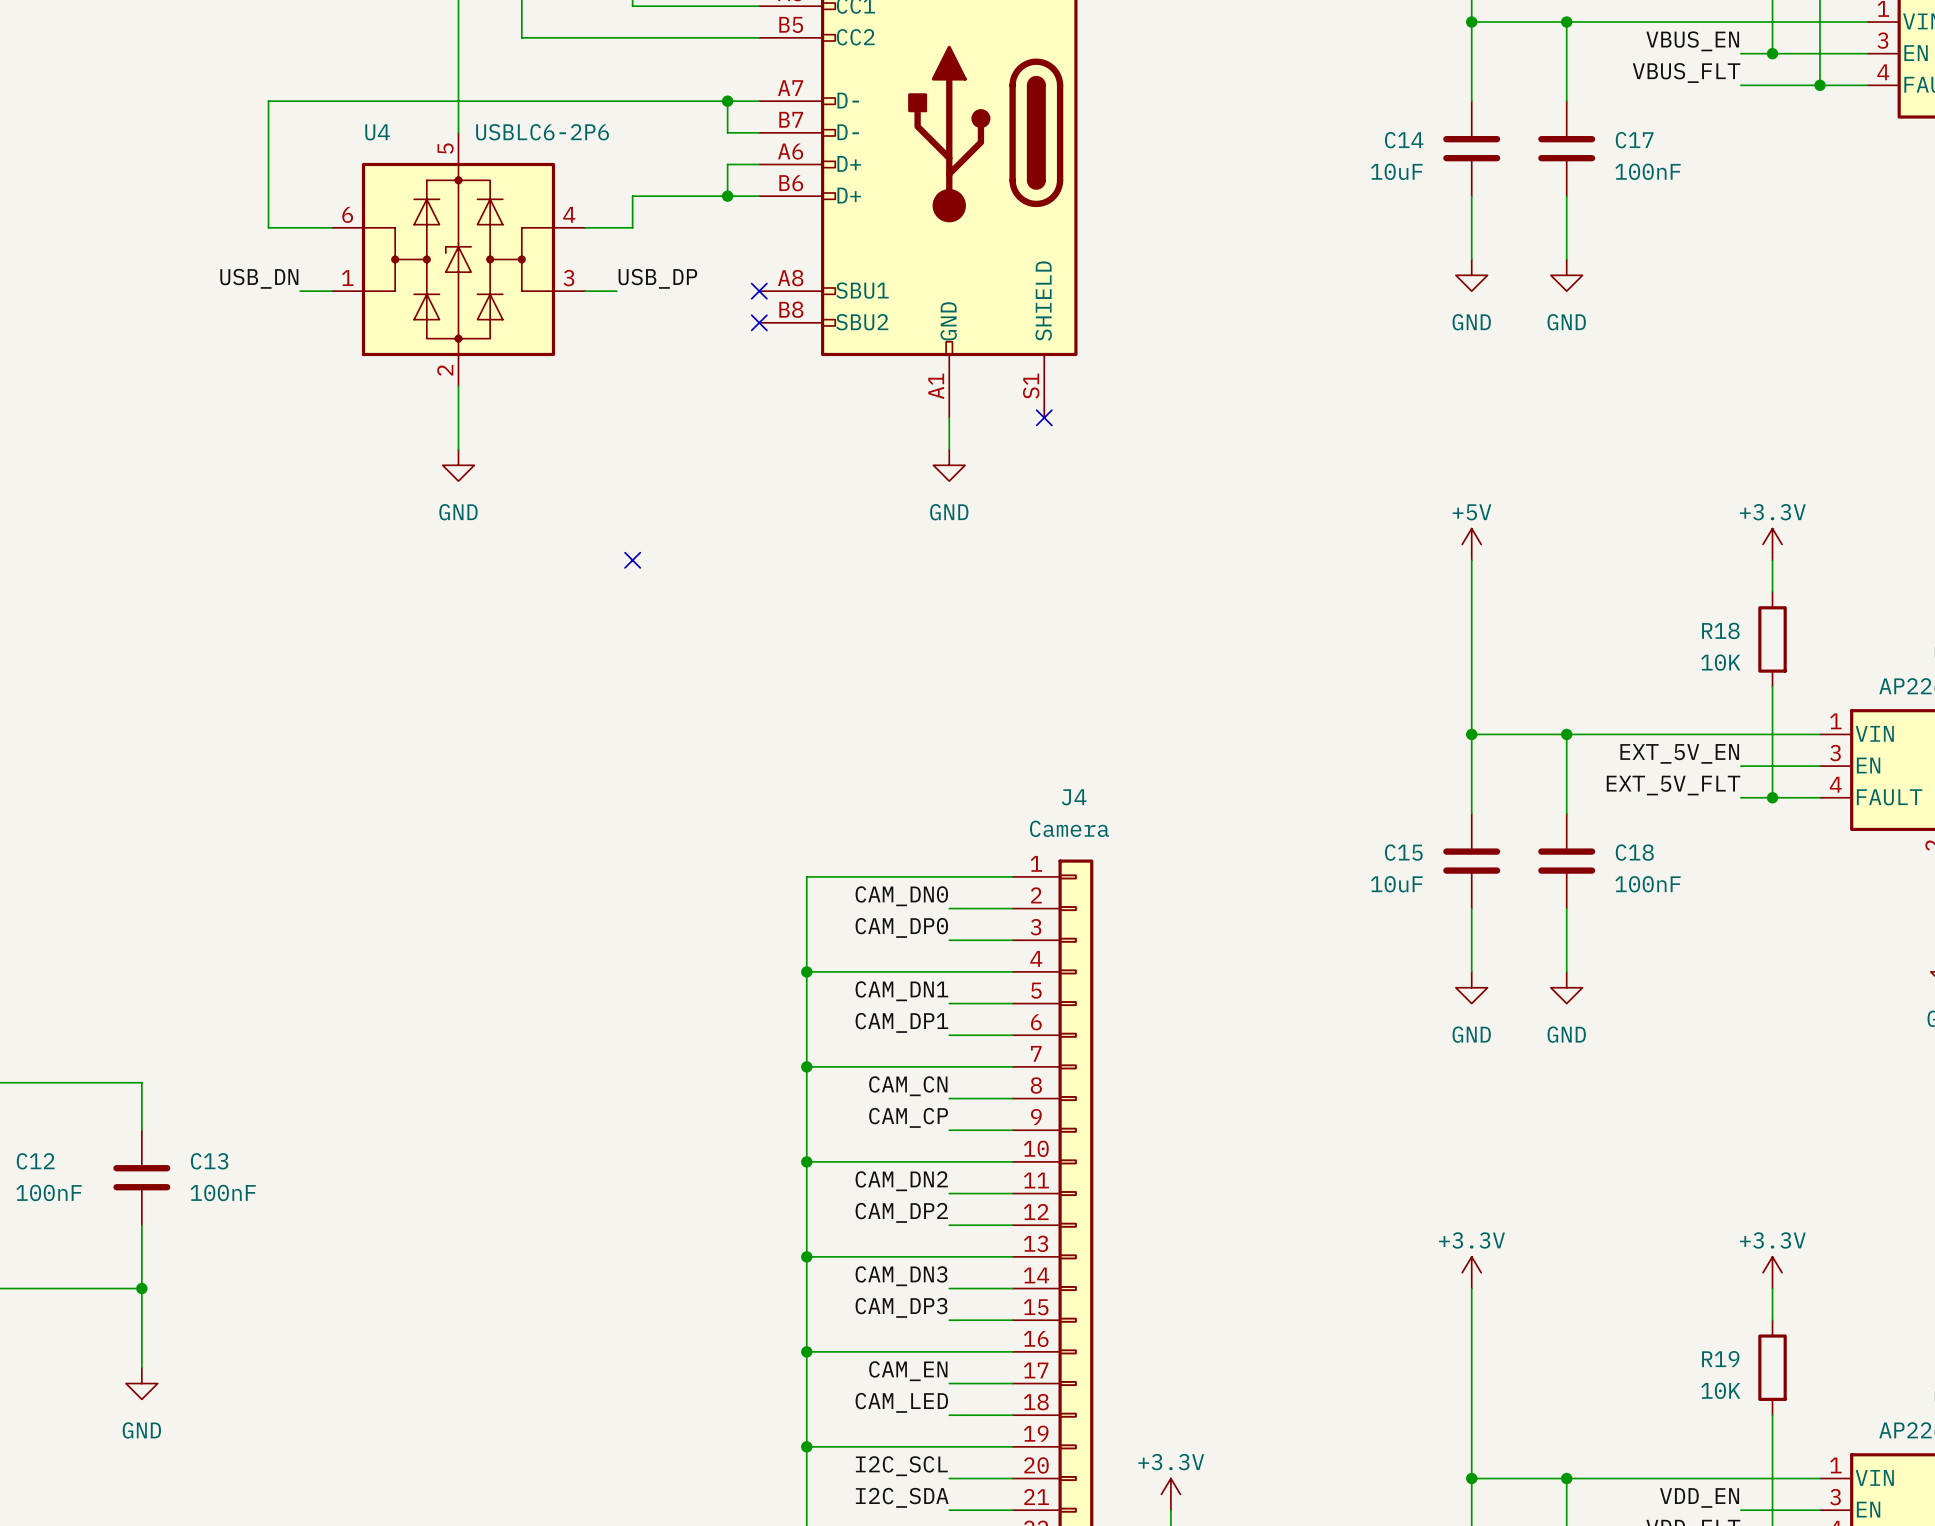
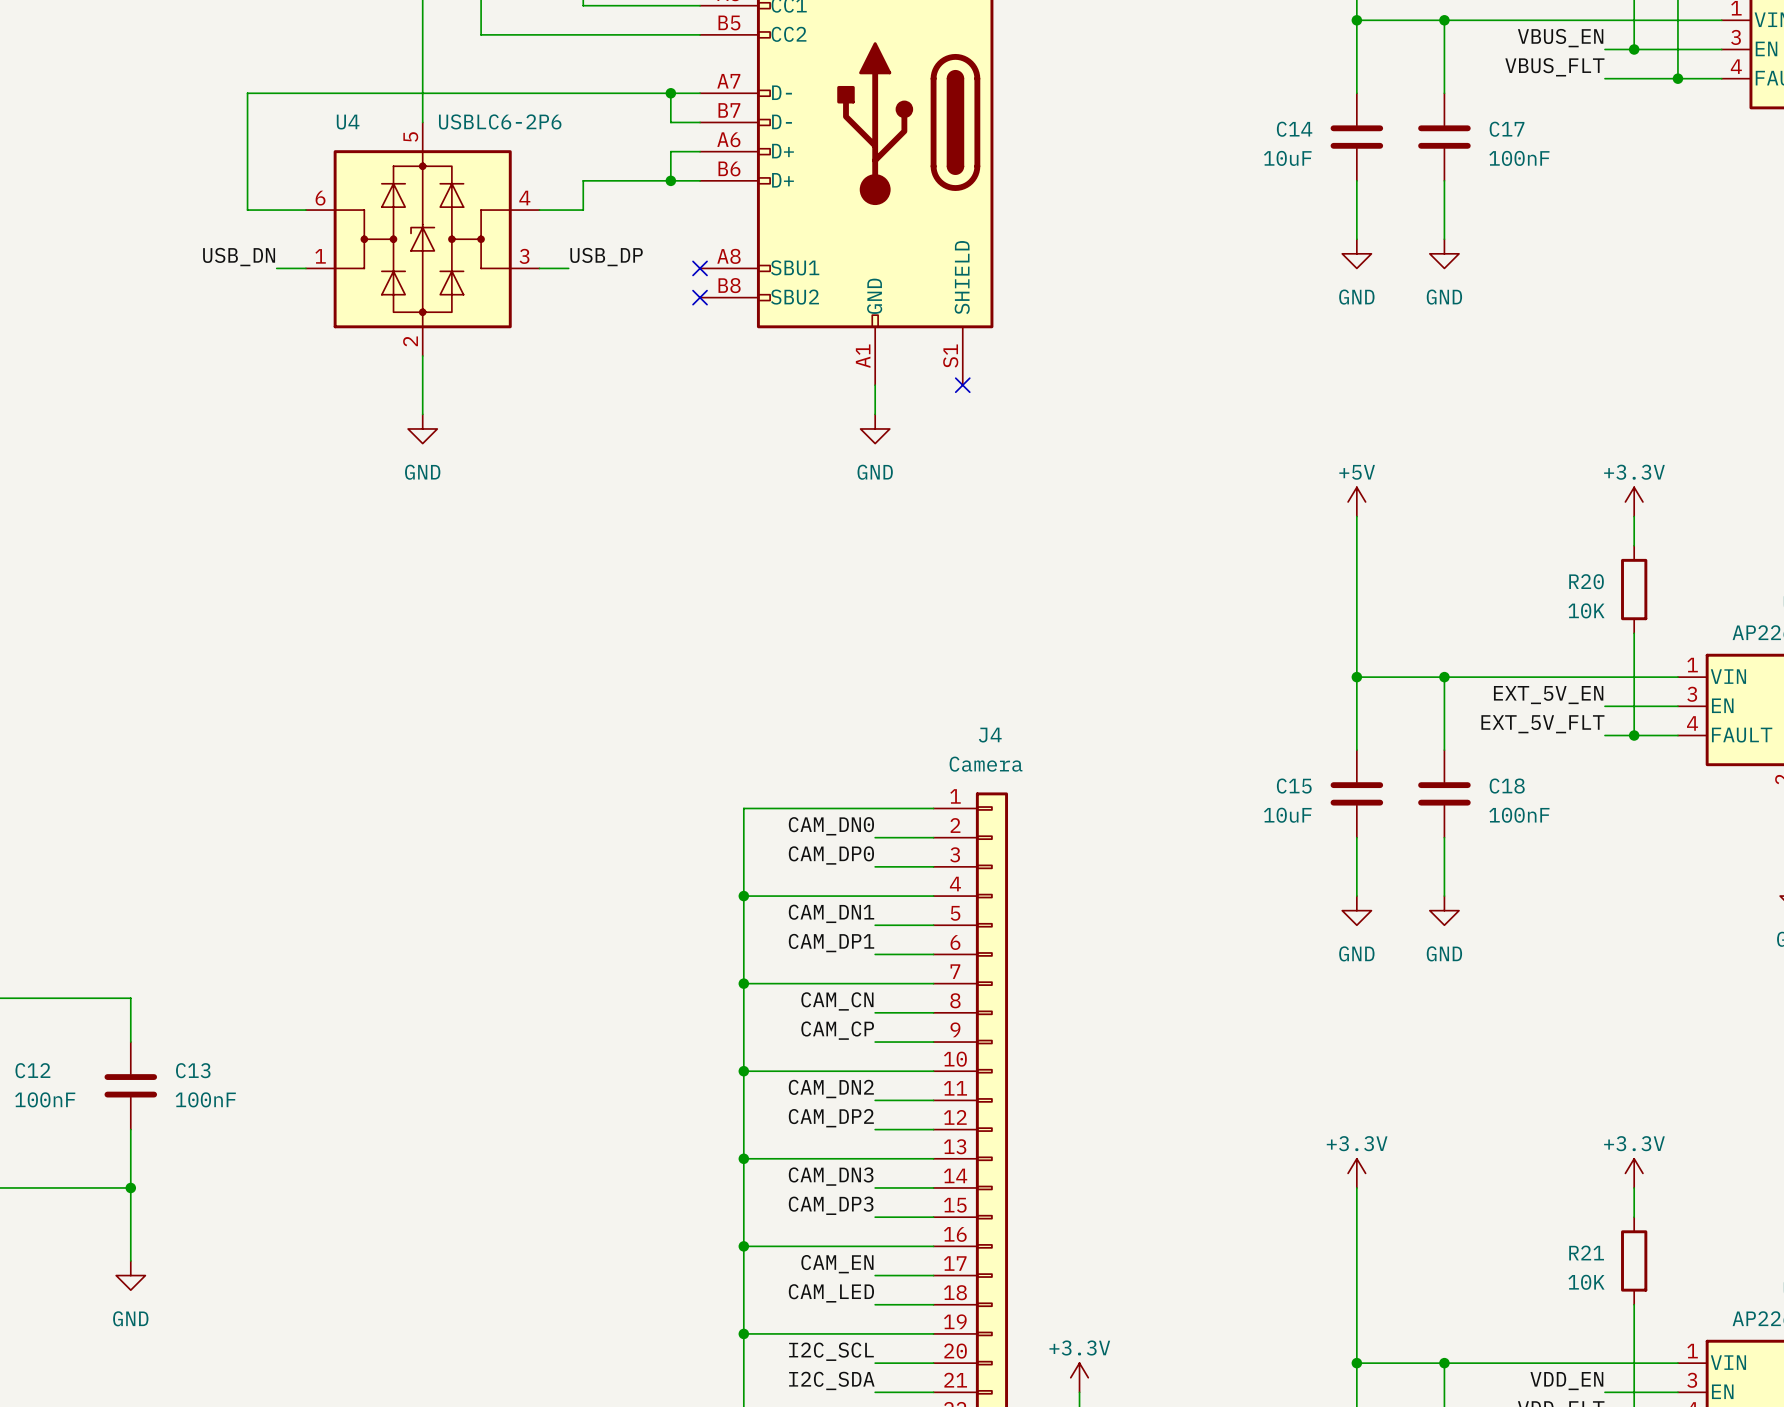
no-connect mark: (632, 560) -> none
R18 name: R18 (1720, 630) -> R20 (1586, 581)
R19 name: R19 (1720, 1359) -> R21 (1586, 1252)

